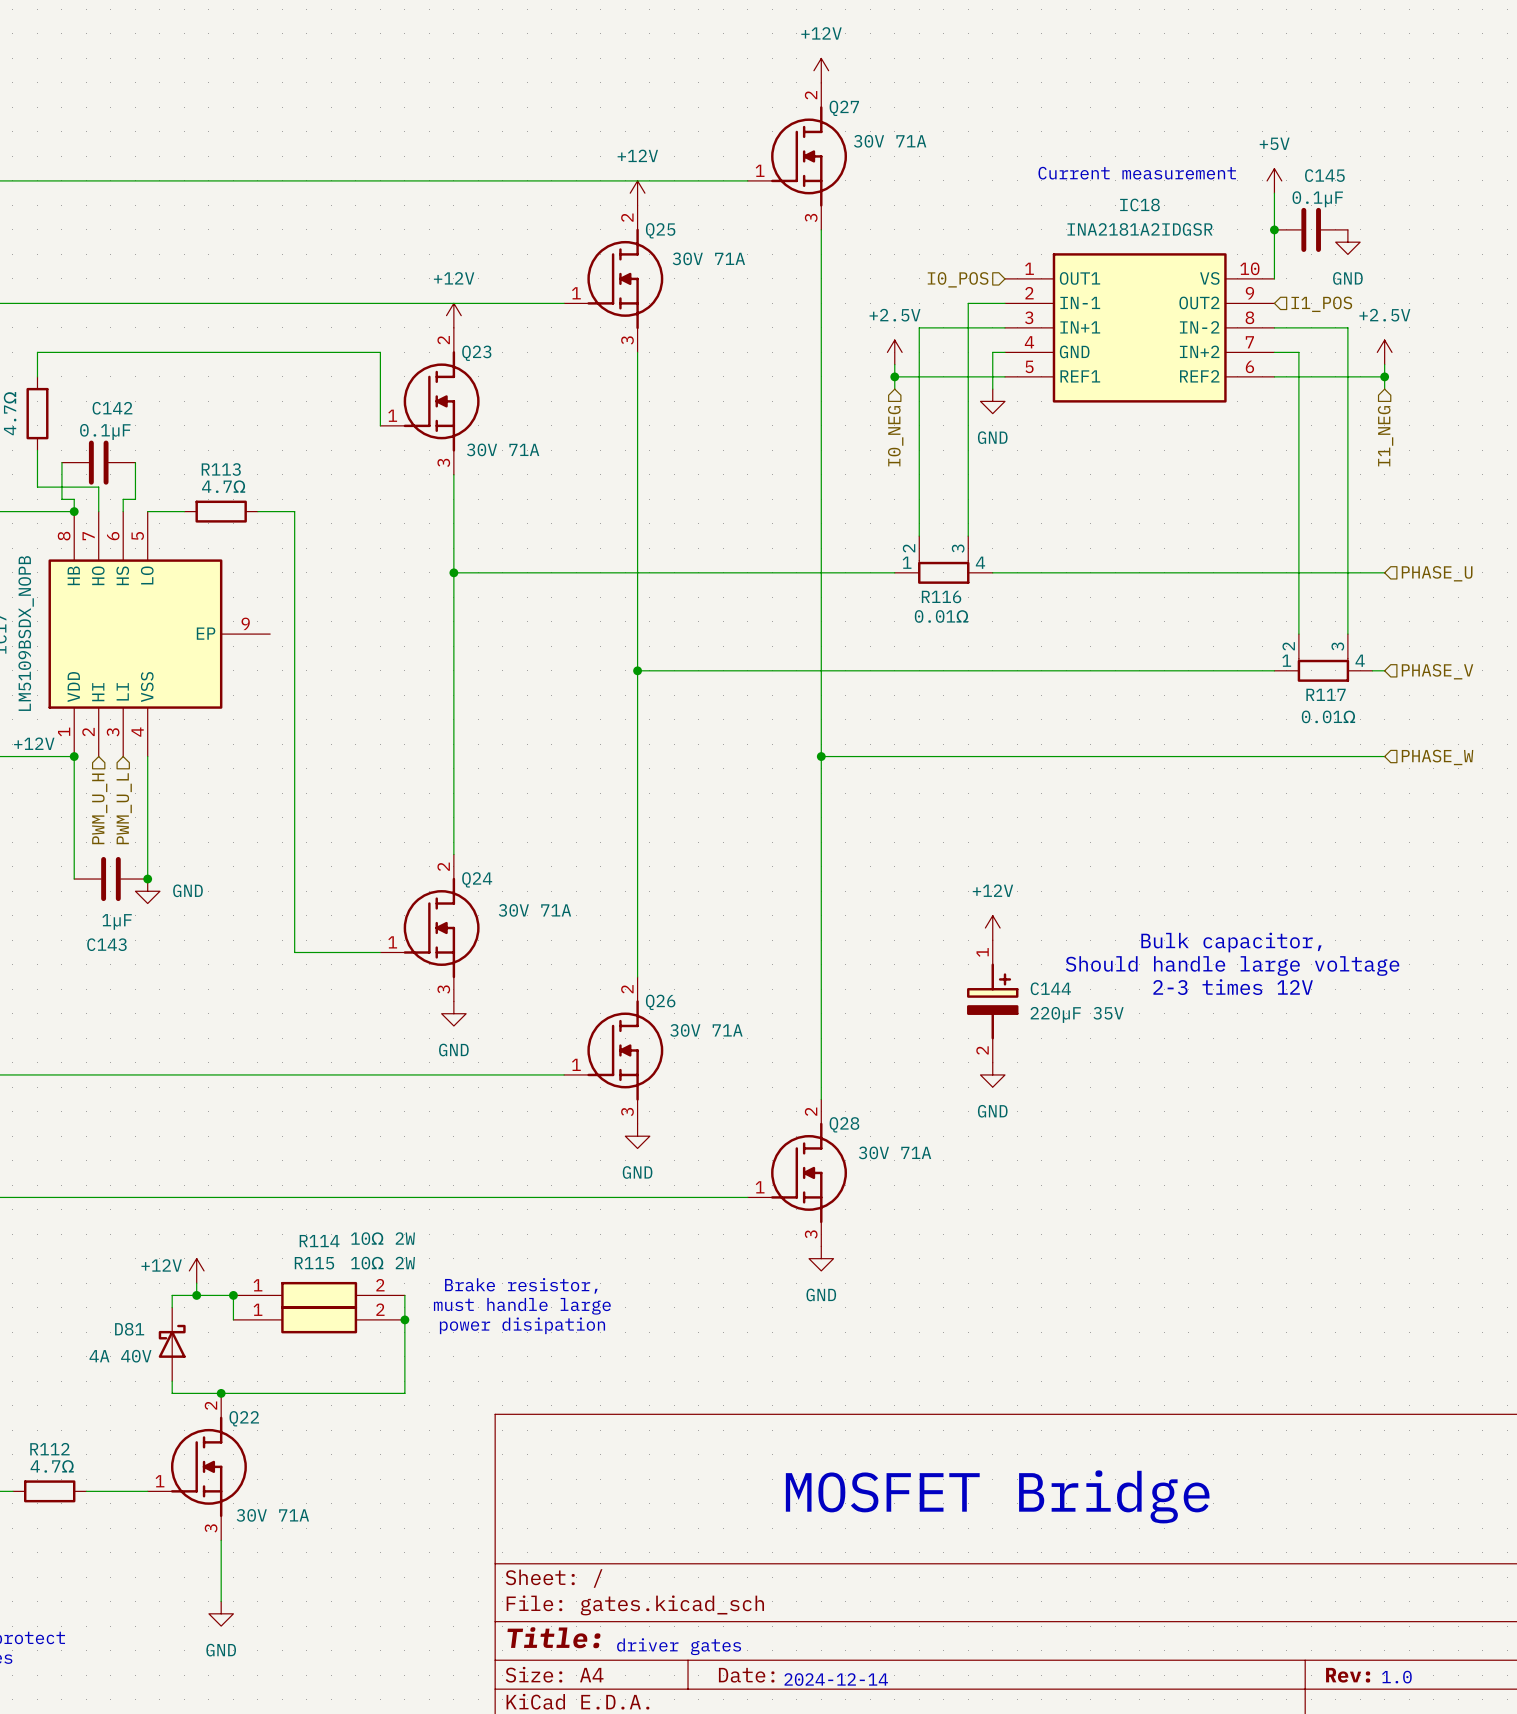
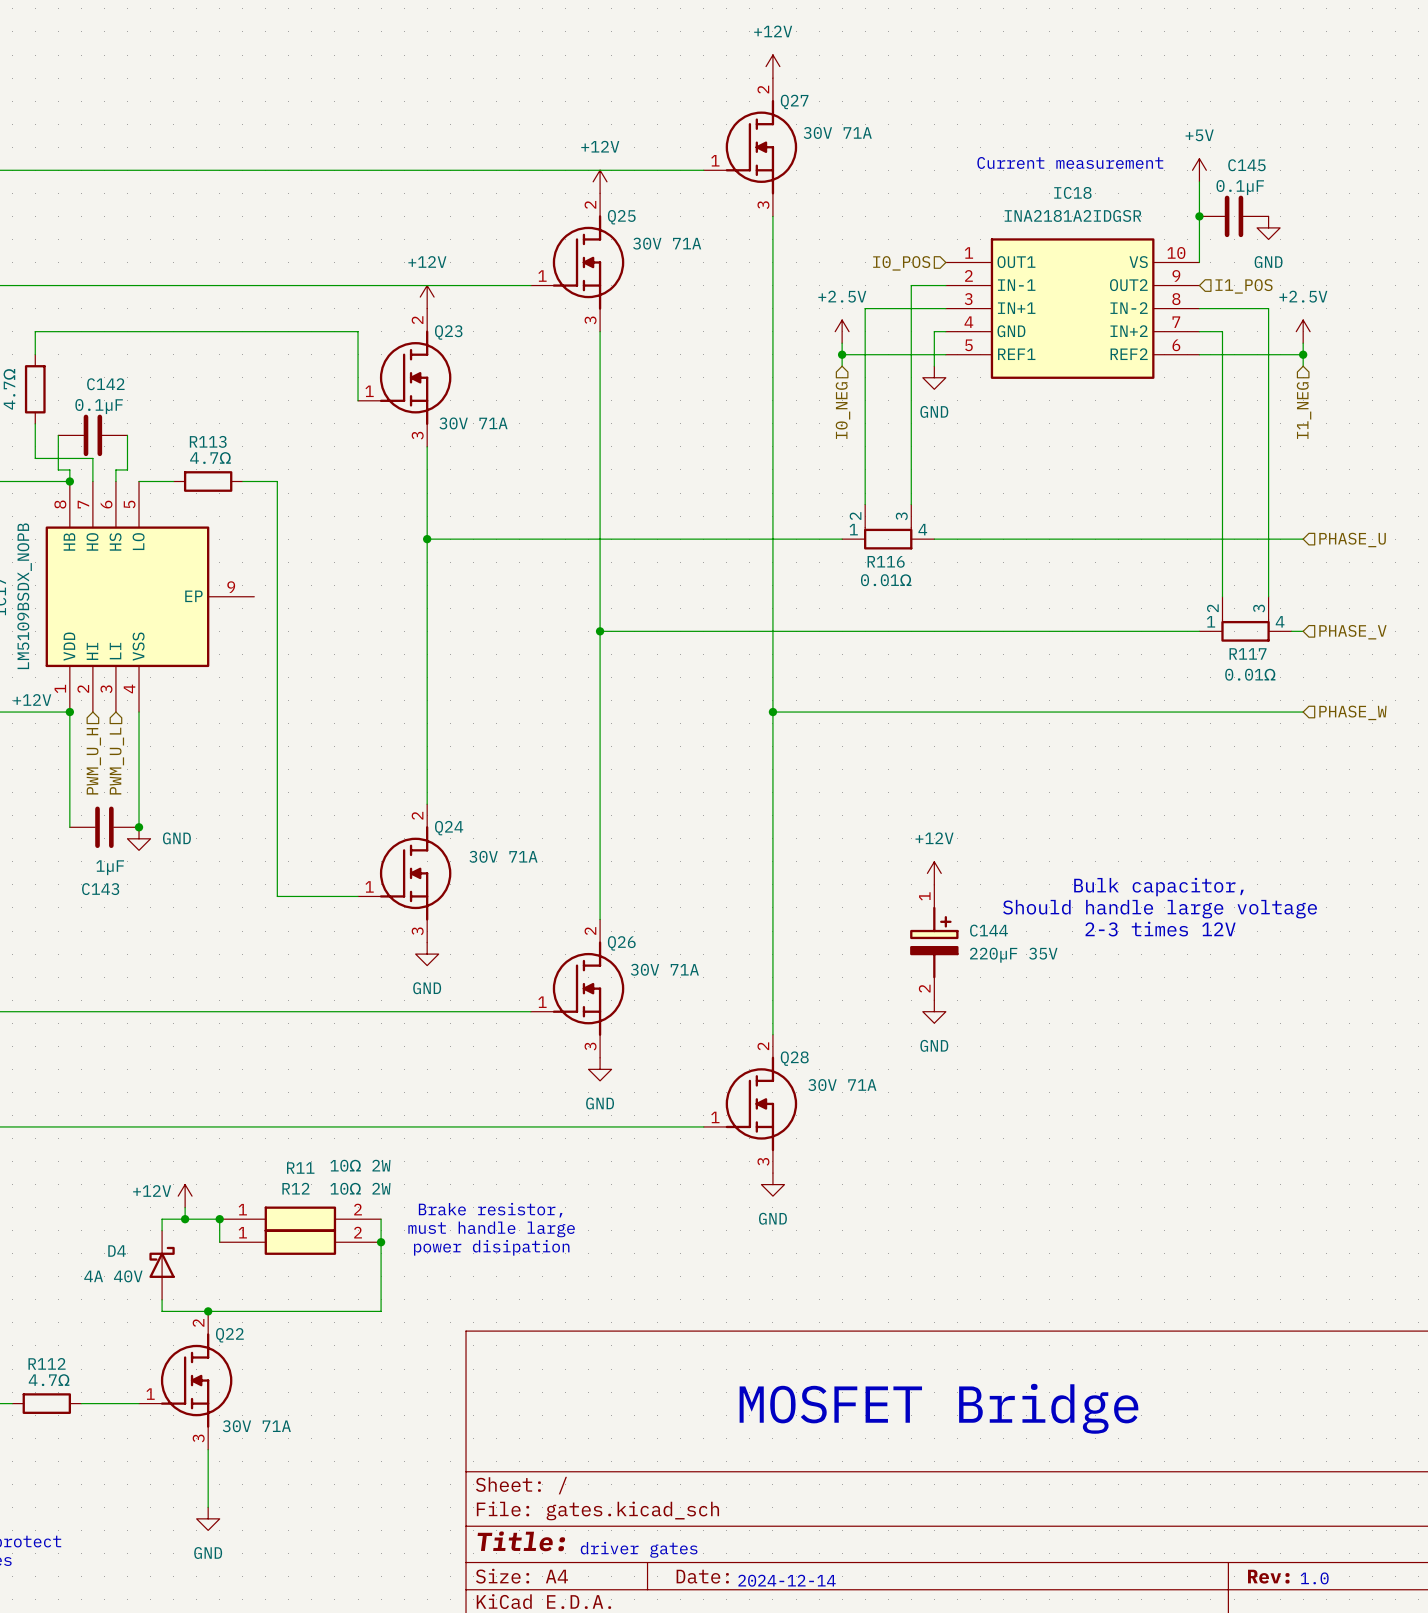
R114 name: R114 (319, 1241) -> R11 (300, 1168)
R115 name: R115 (314, 1263) -> R12 (295, 1188)
D81 name: D81 (129, 1329) -> D4 (117, 1251)

